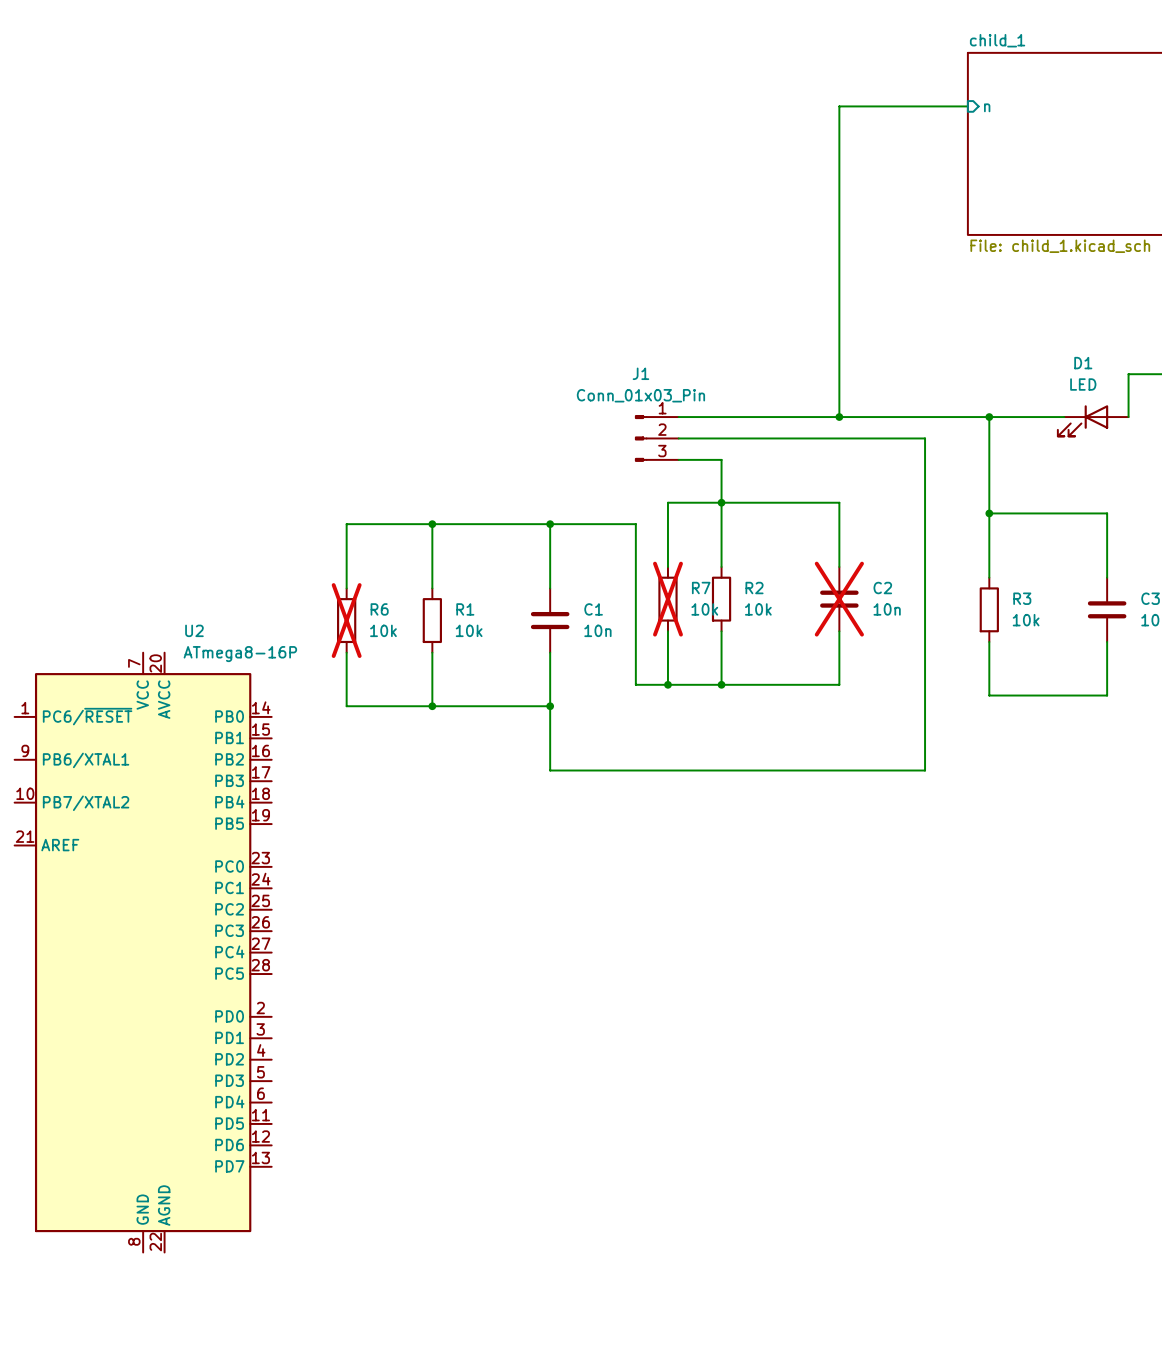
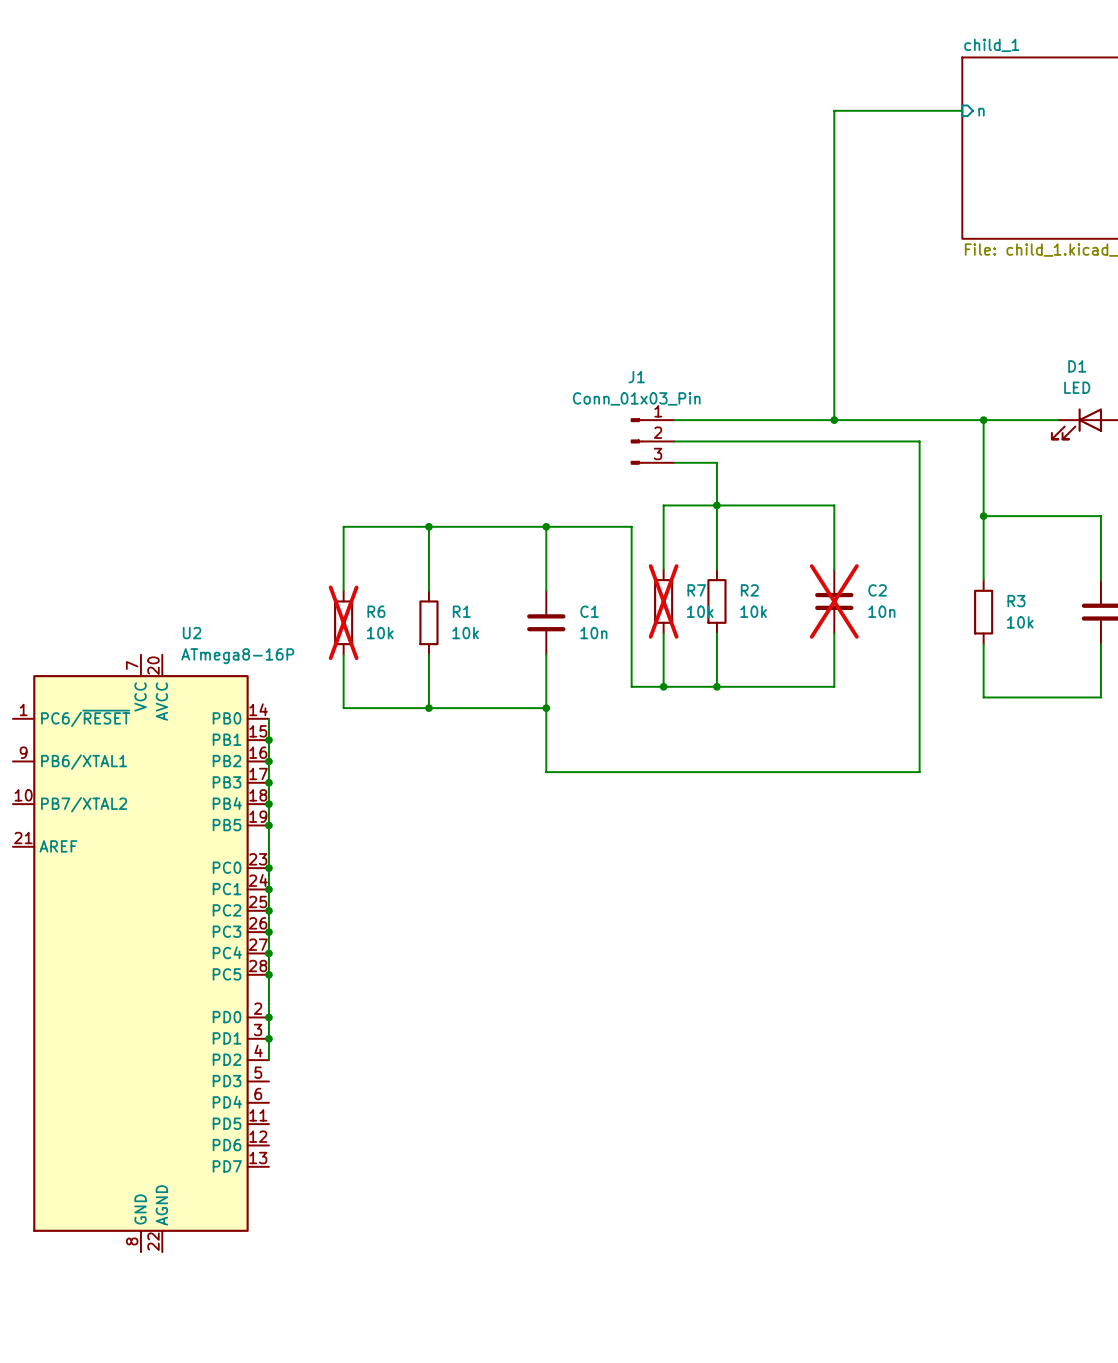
wire: none -> (268, 718) (268, 1060)
junction: none -> (268, 740)
junction: none -> (268, 761)
junction: none -> (268, 782)
junction: none -> (268, 804)
junction: none -> (268, 825)
junction: none -> (268, 868)
junction: none -> (268, 889)
junction: none -> (268, 910)
junction: none -> (268, 932)
junction: none -> (268, 953)
junction: none -> (268, 974)
junction: none -> (268, 1017)
junction: none -> (268, 1038)

